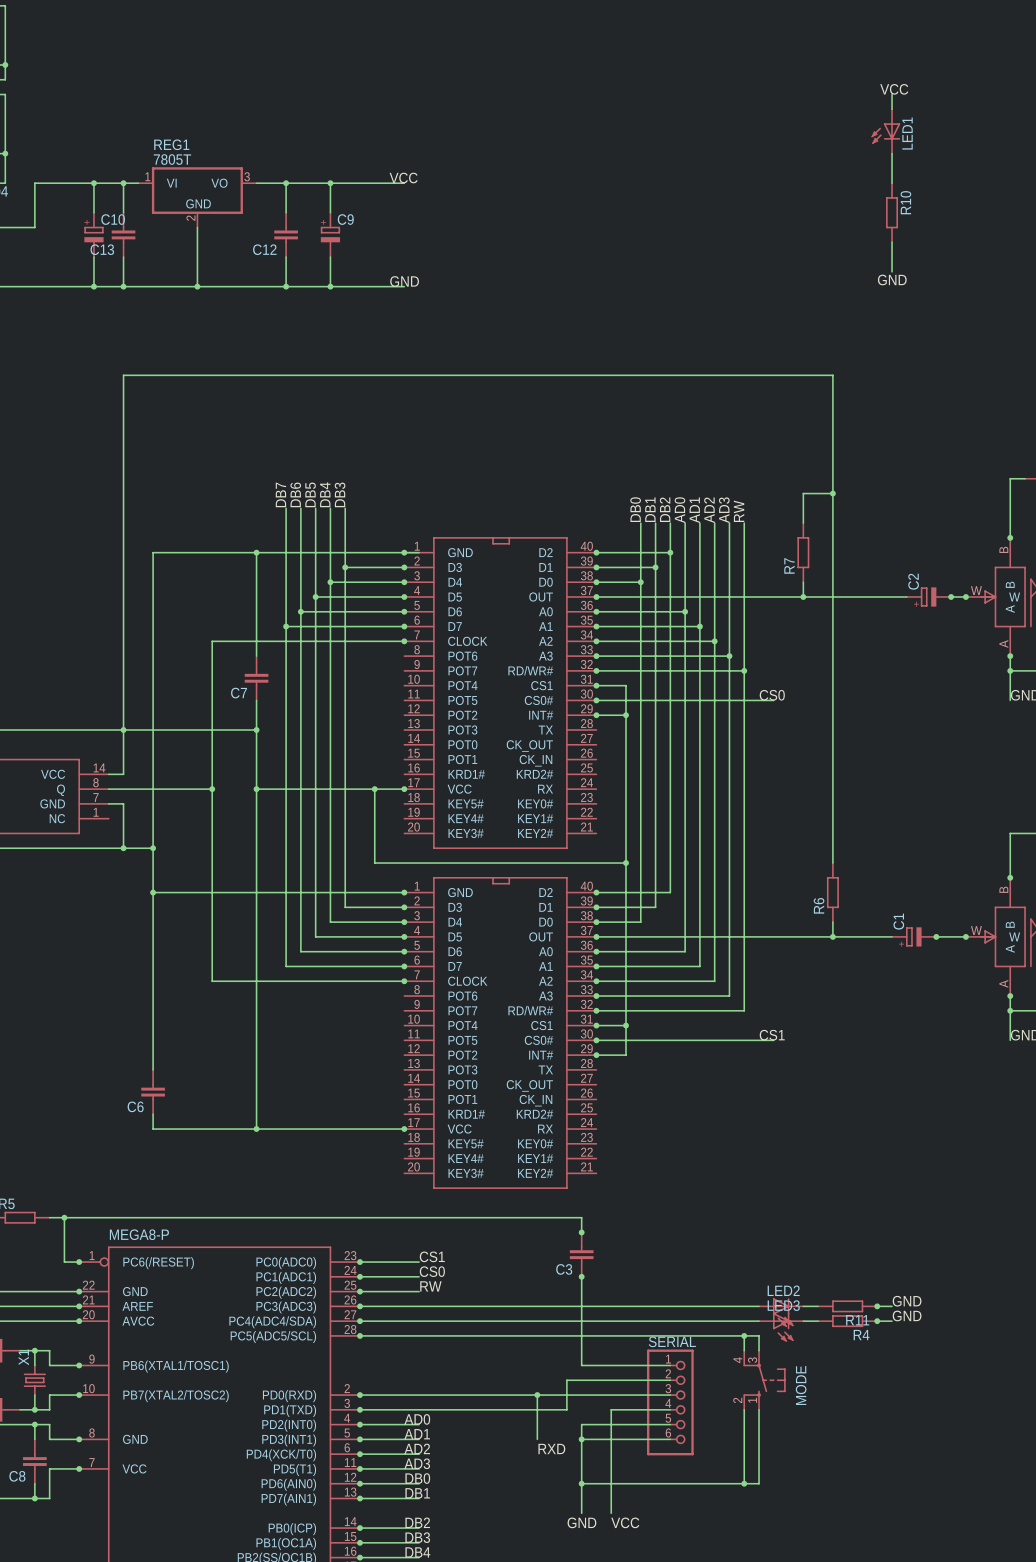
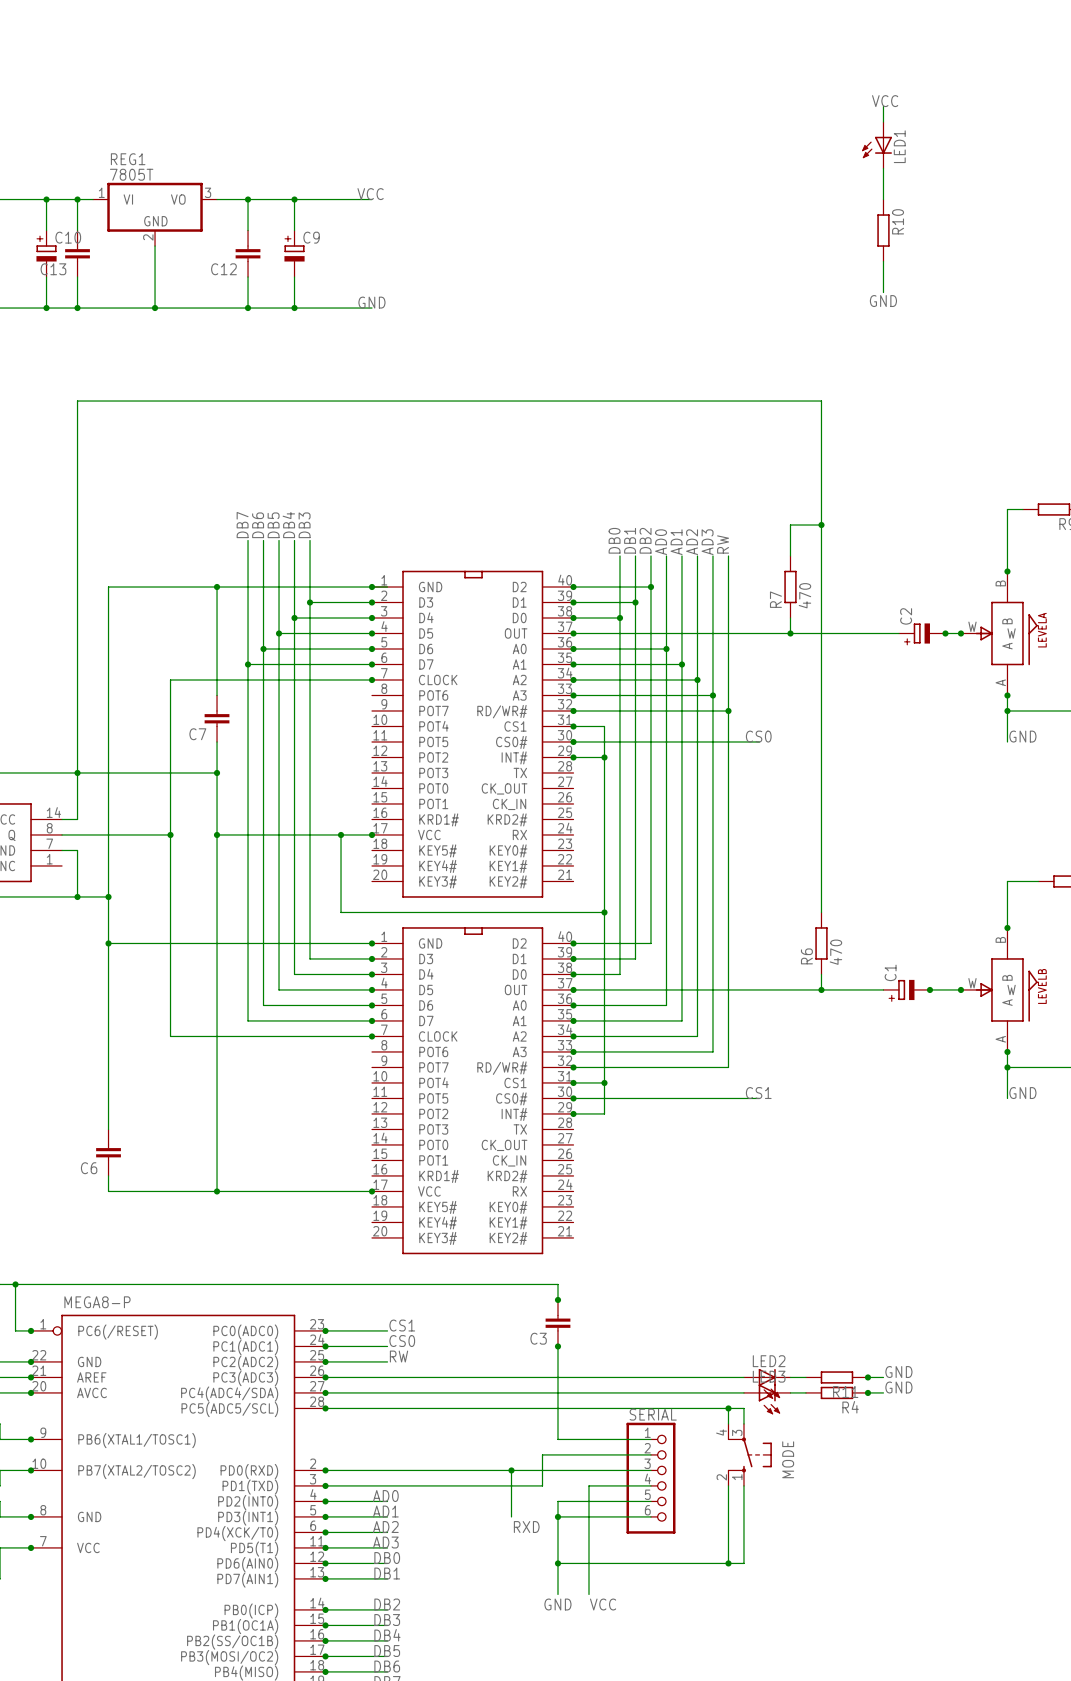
R7 value: none -> 470 (804, 595)
R6 value: none -> 470 (835, 952)

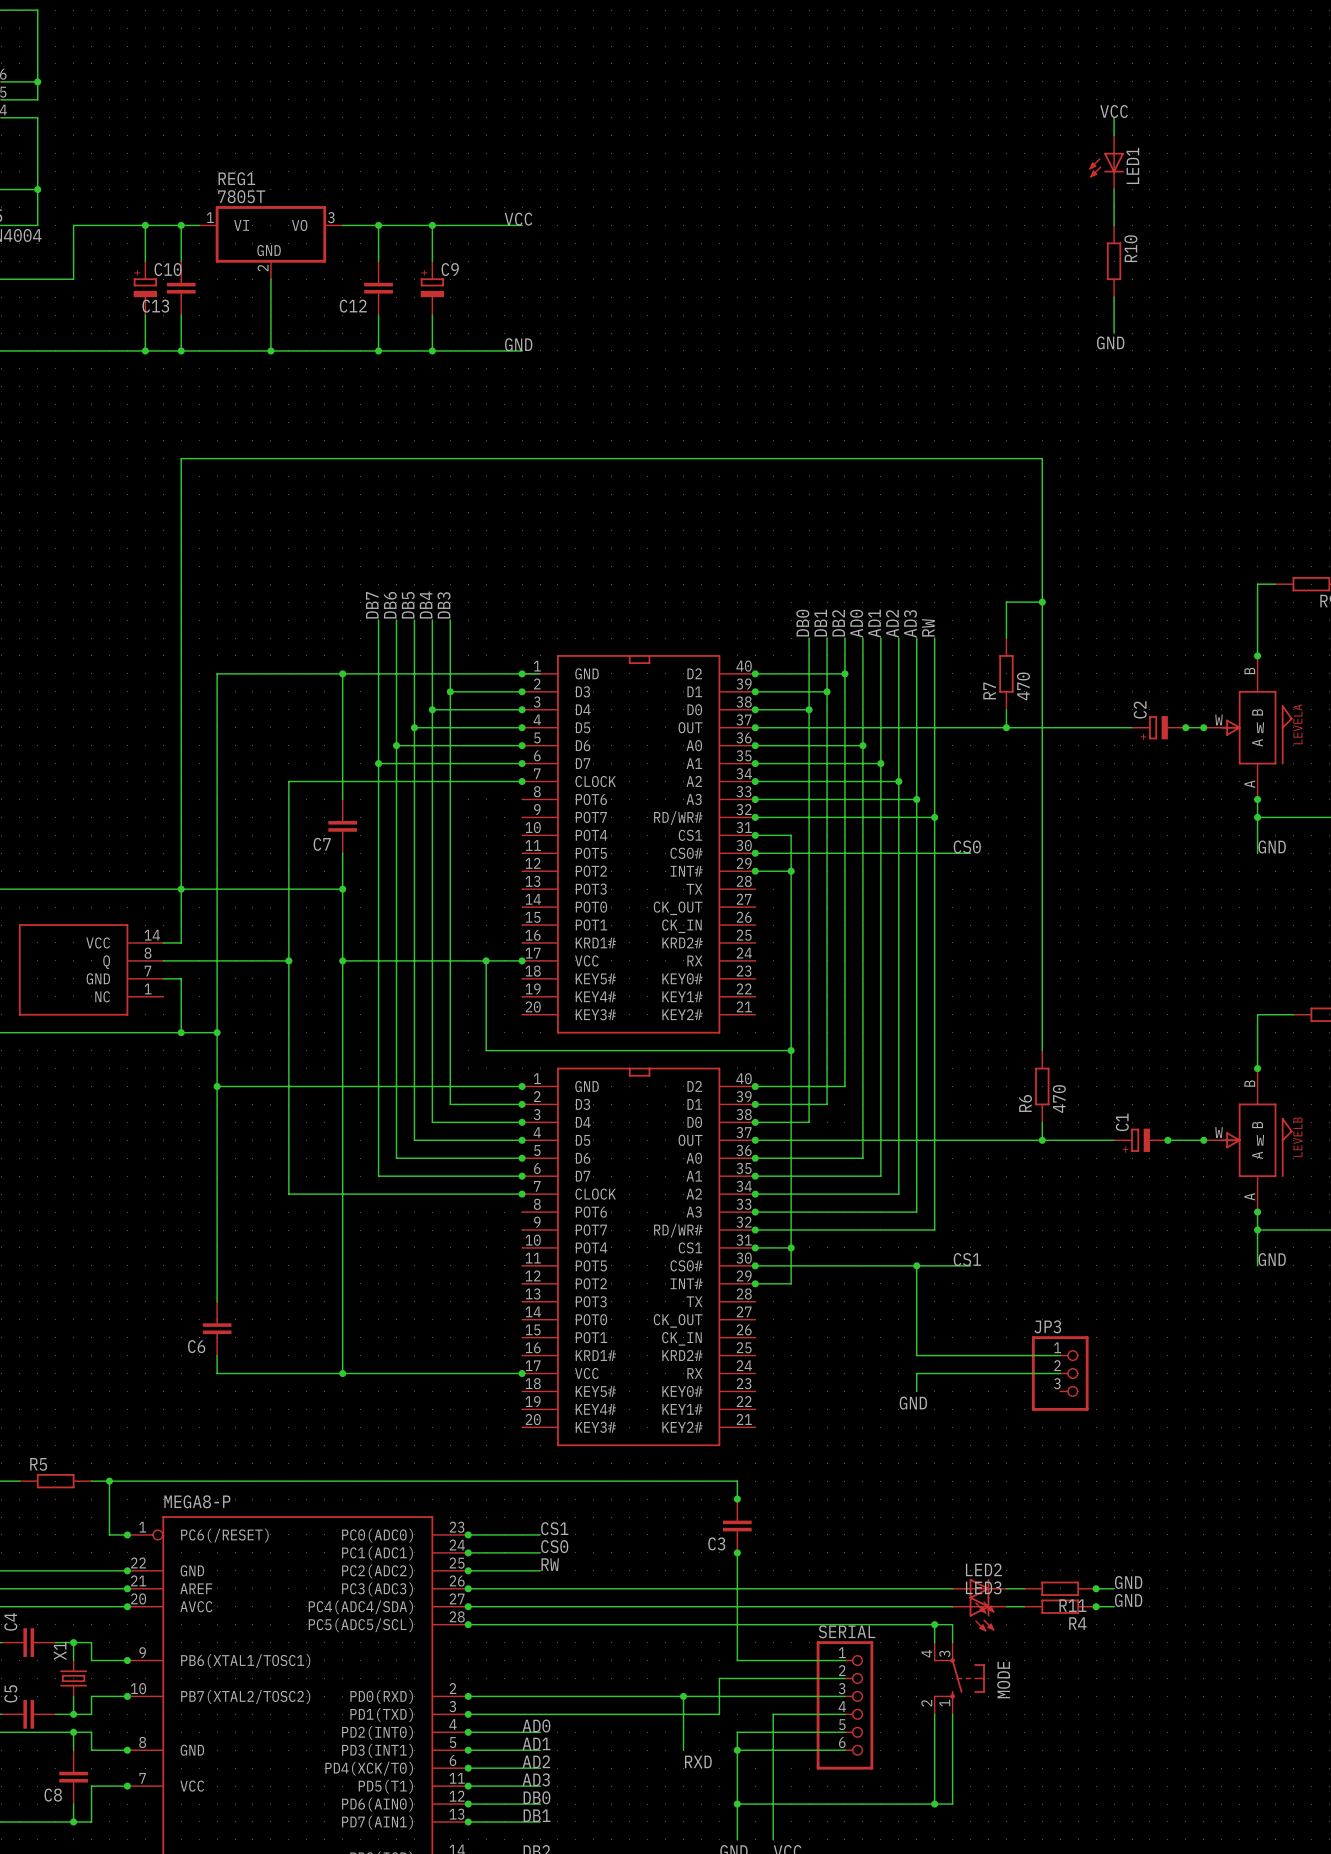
wire: none -> (916, 1265) (916, 1355) (1060, 1355)
junction: none -> (916, 1265)
wire: none -> (1060, 1373) (916, 1373) (916, 1391)
JP3: none -> (1060, 1373)
label: none -> GND (913, 1403)

